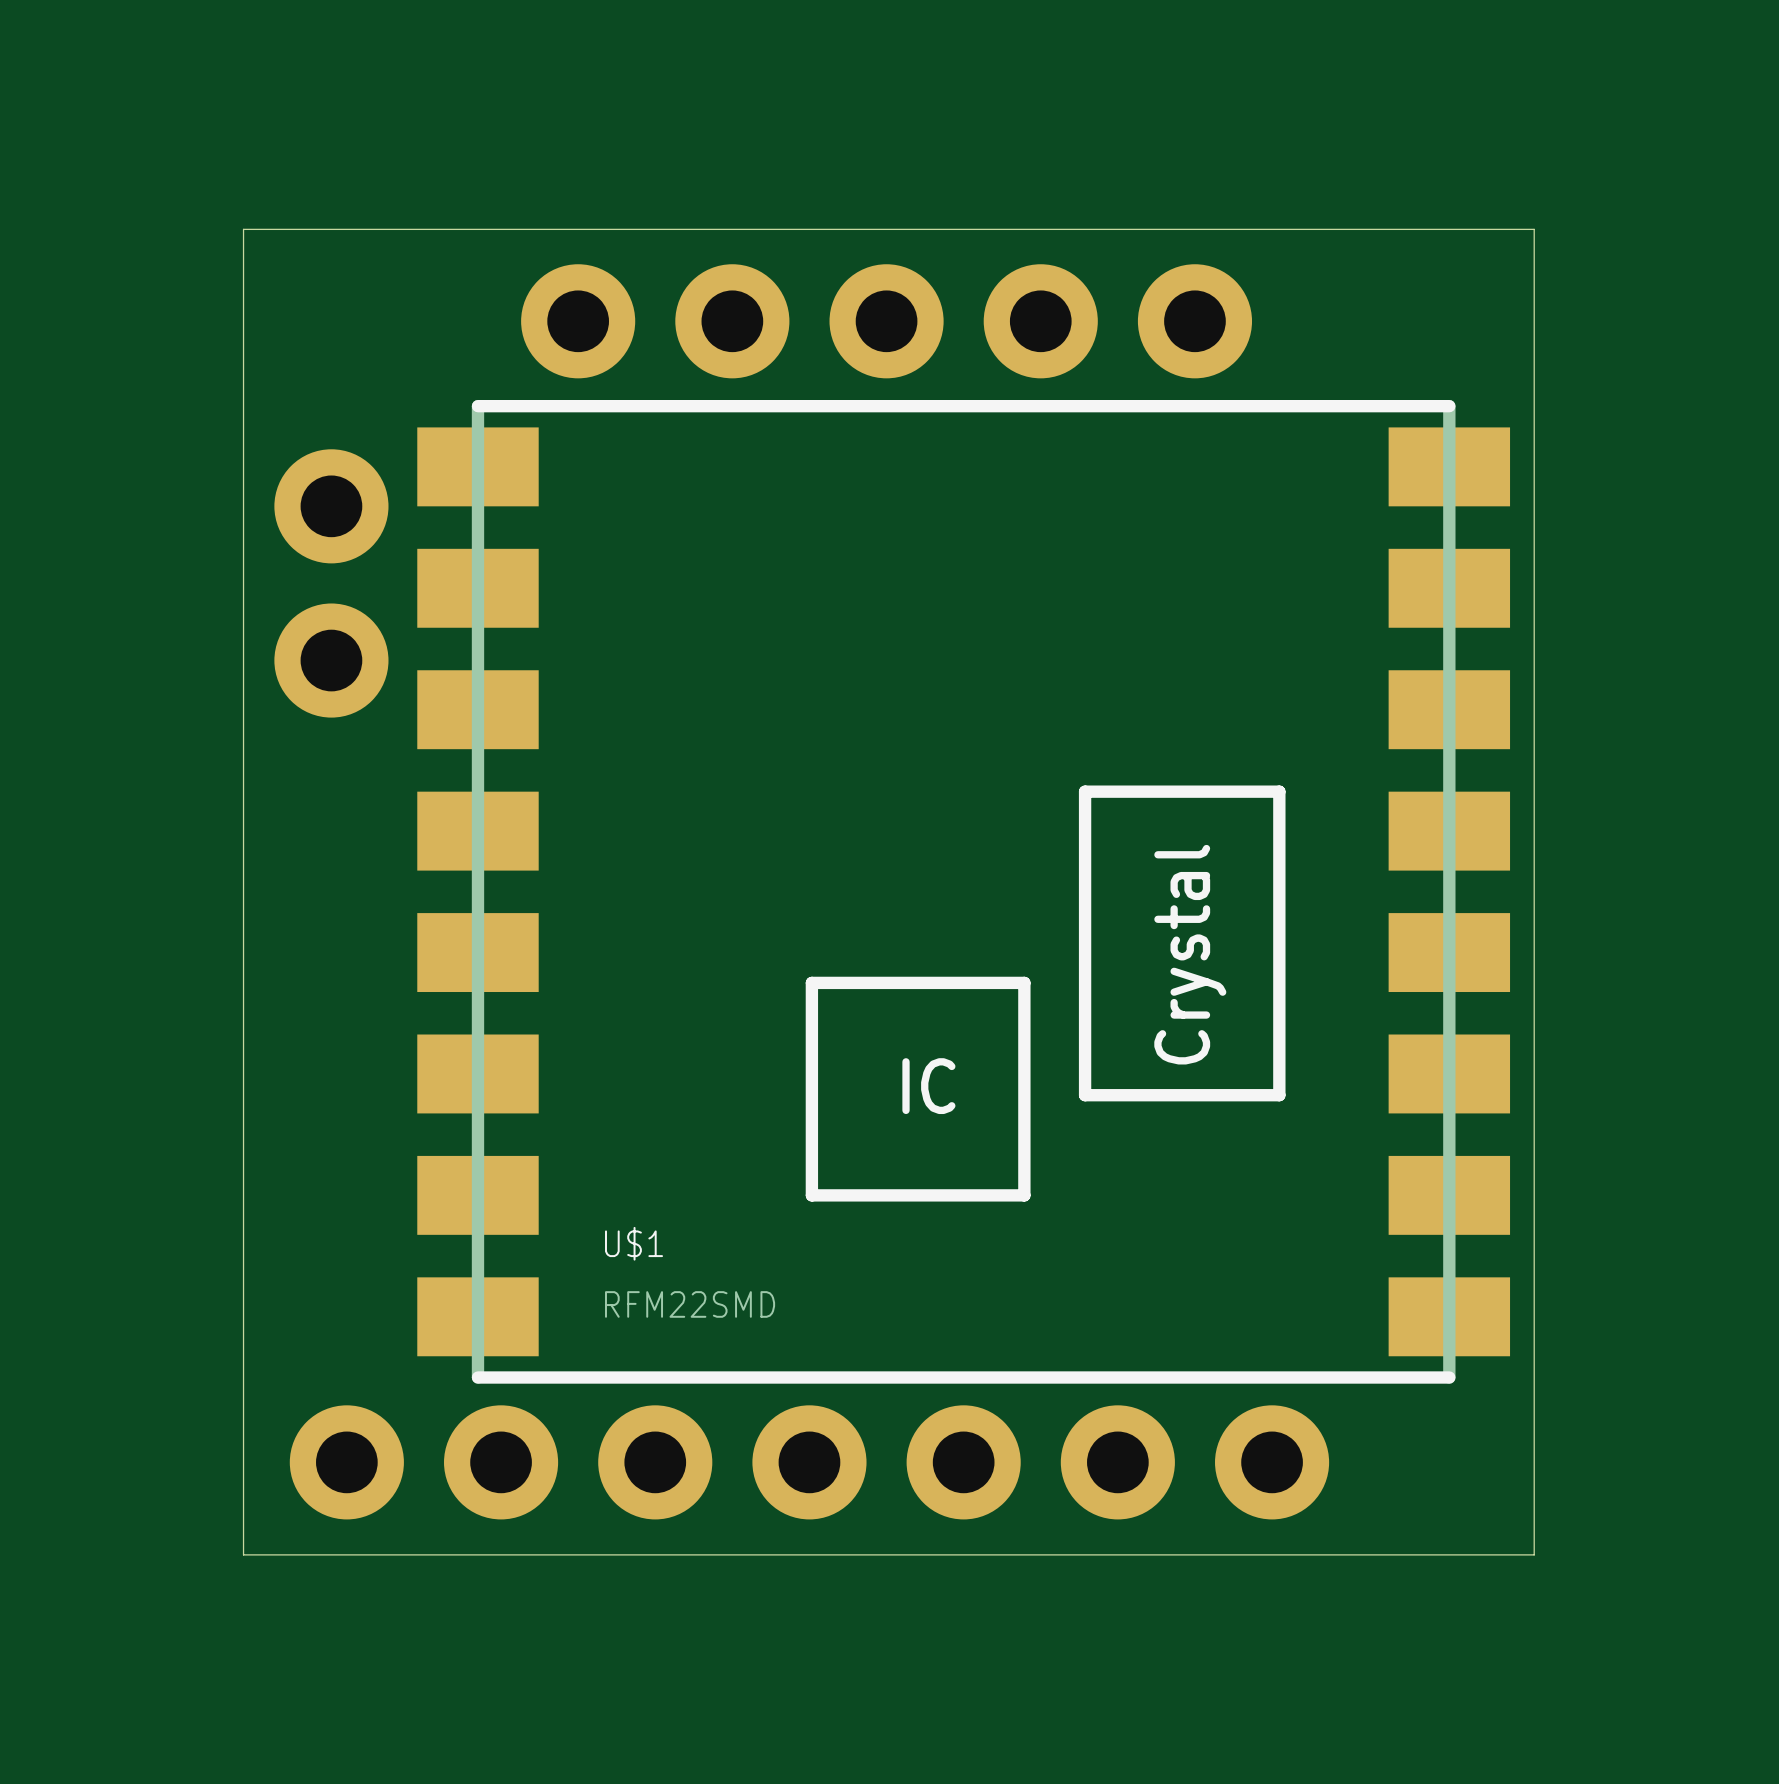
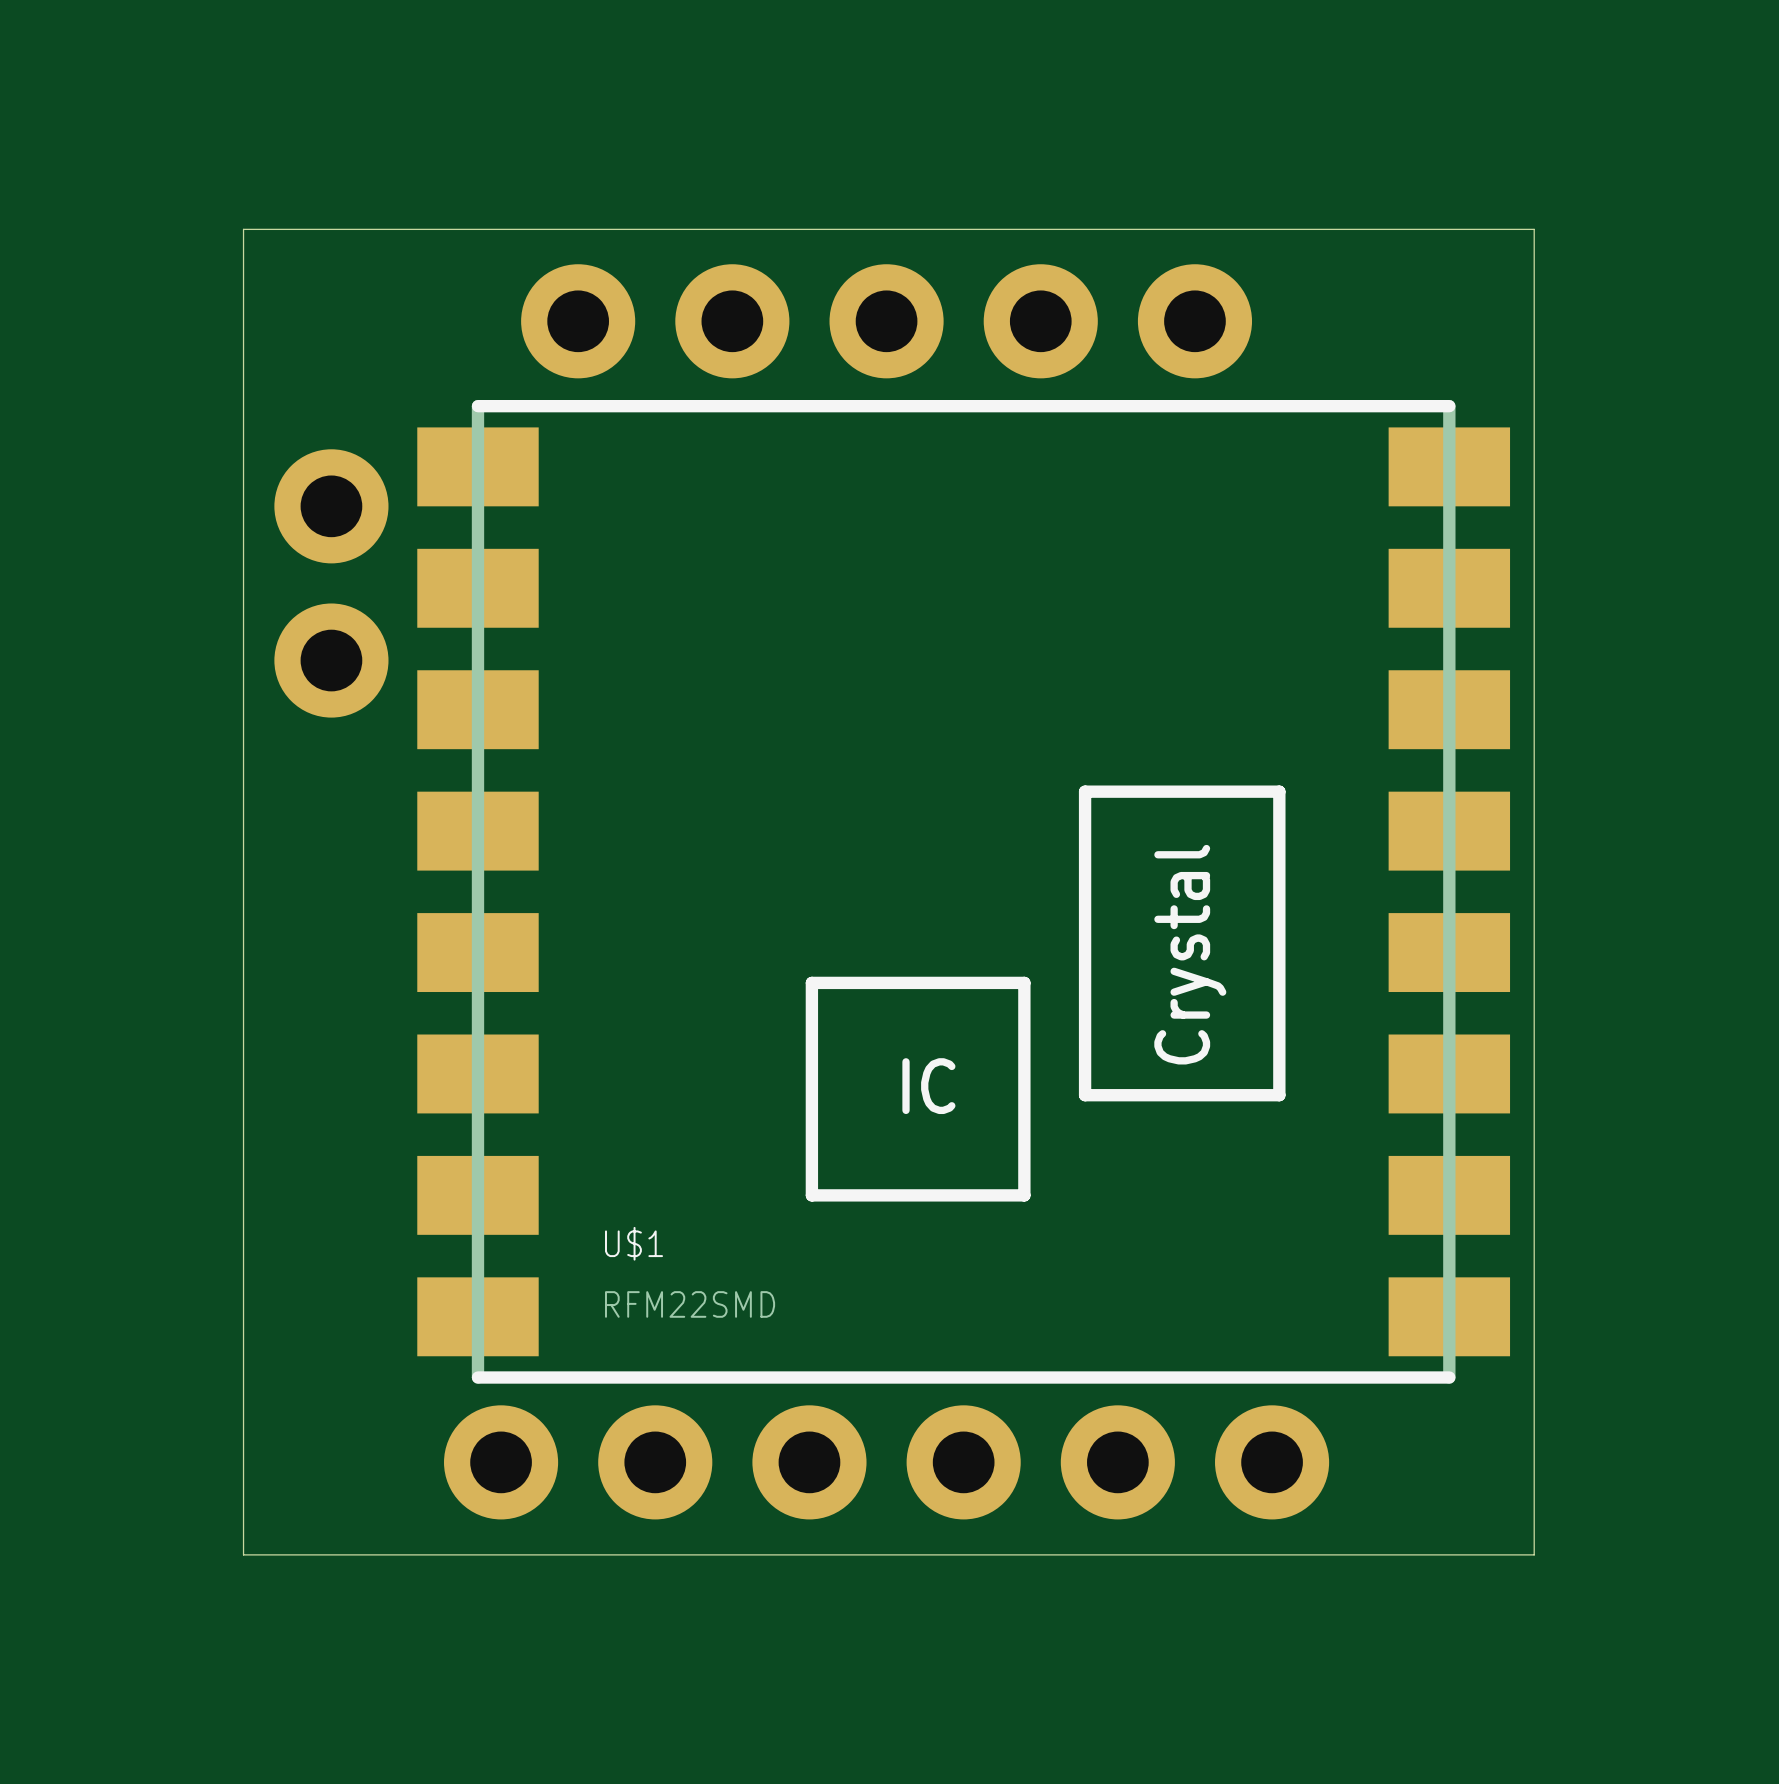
part: (346, 1462) -> none

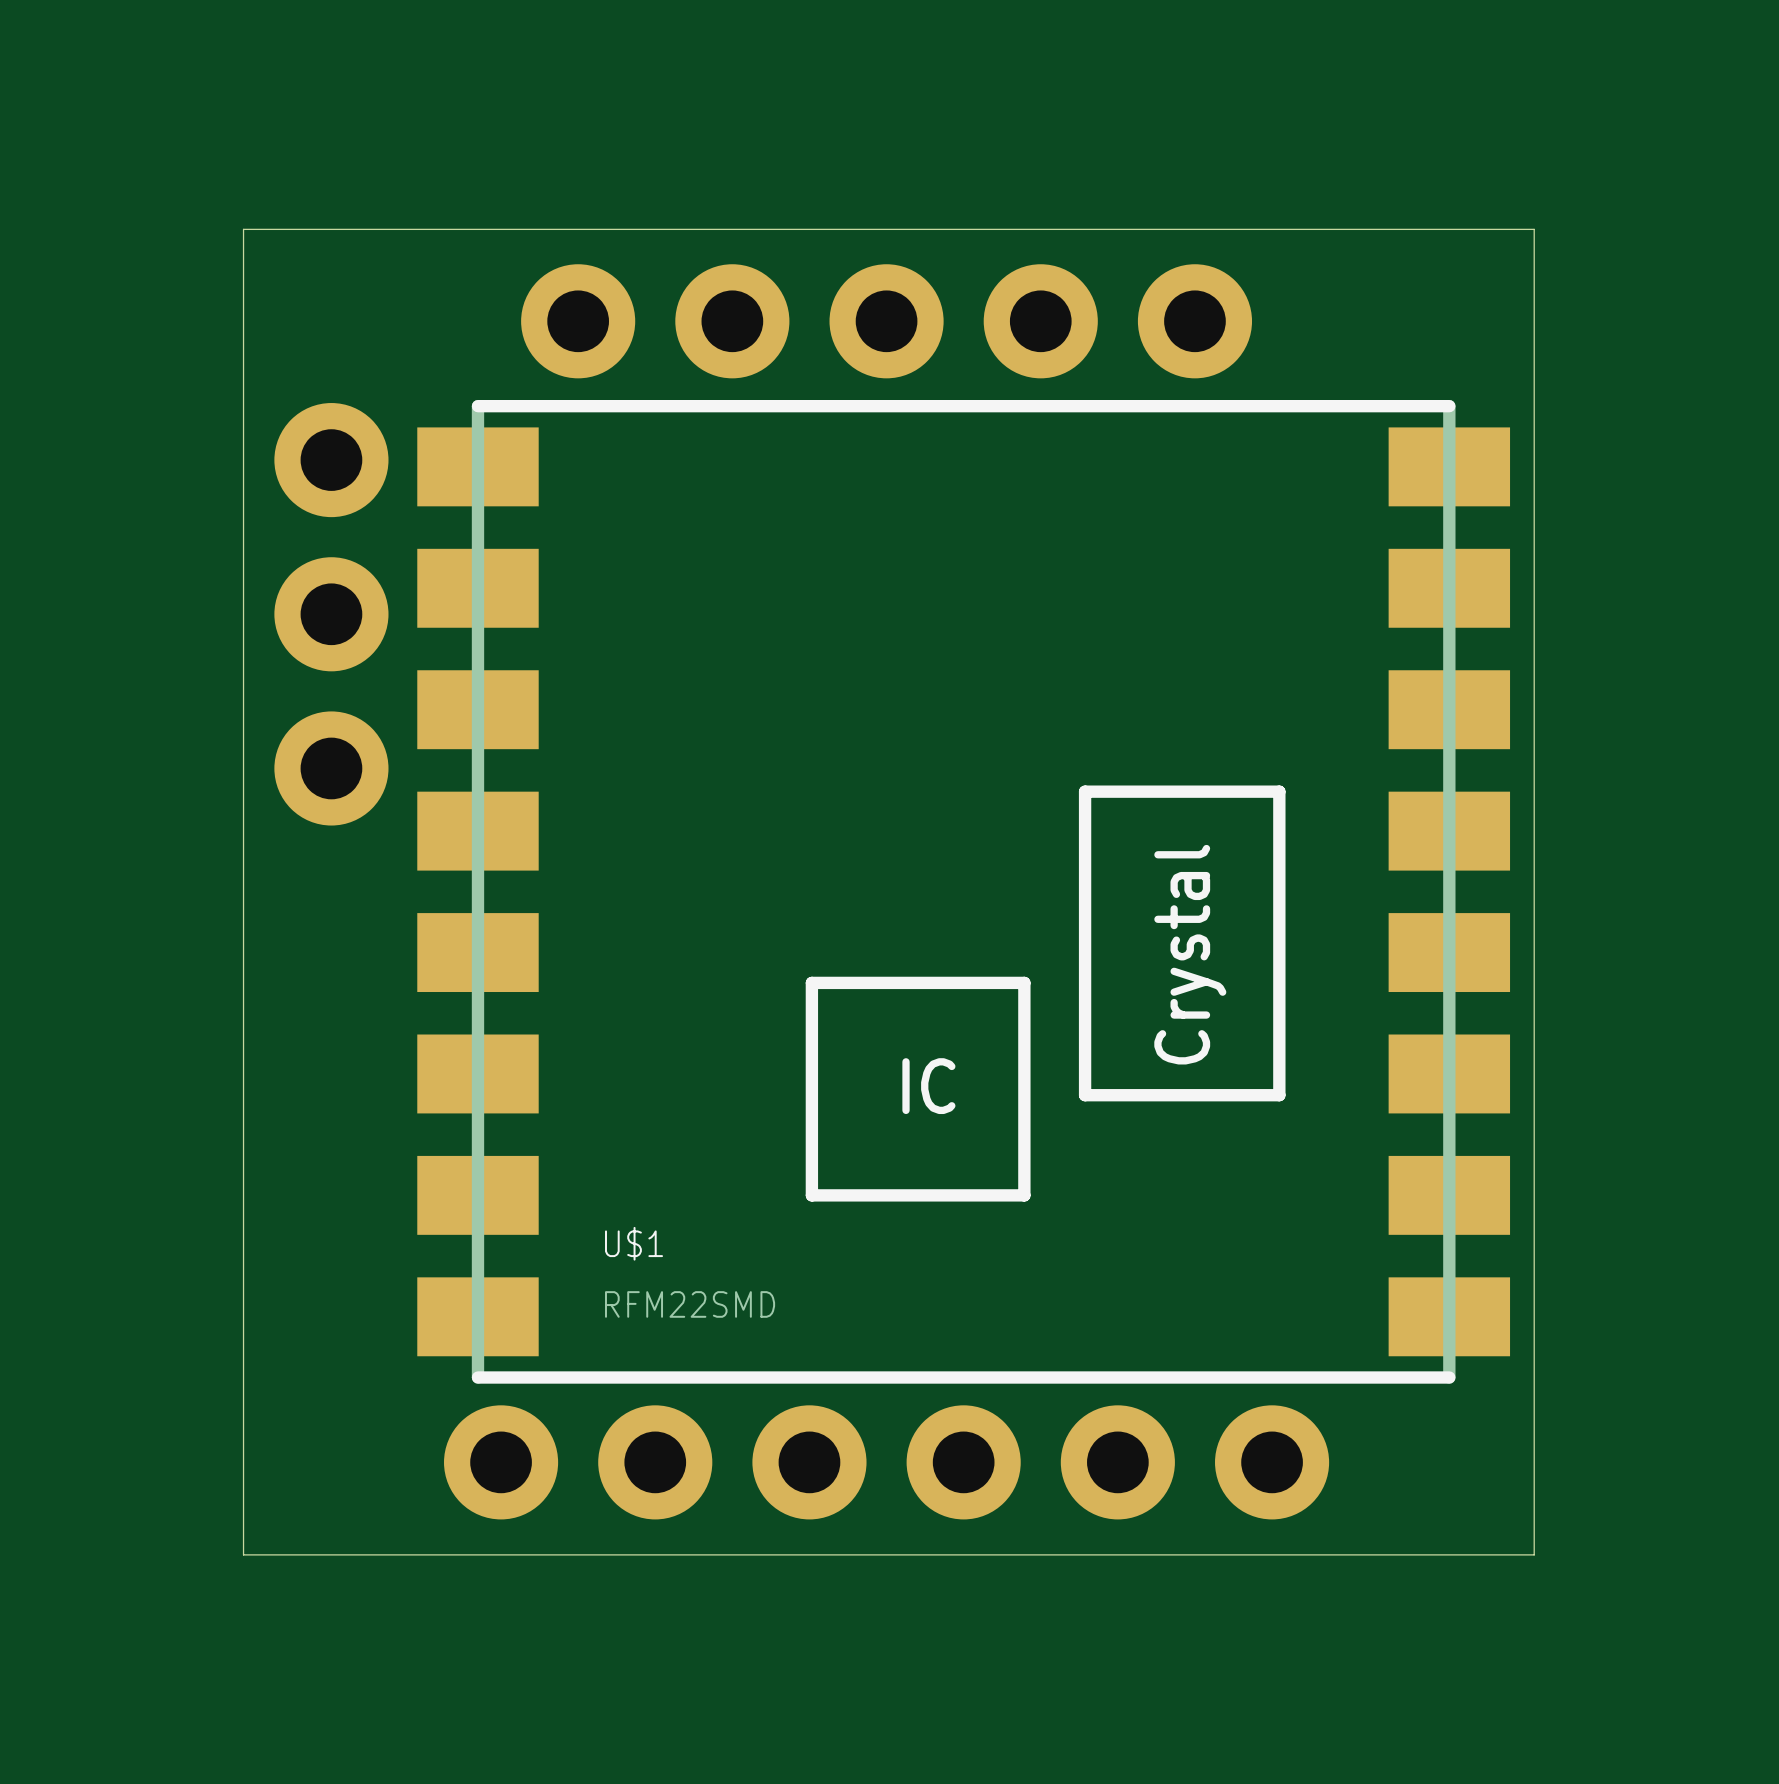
part position: (331, 506) -> (331, 460)
part position: (331, 660) -> (331, 614)
part: none -> (331, 768)

